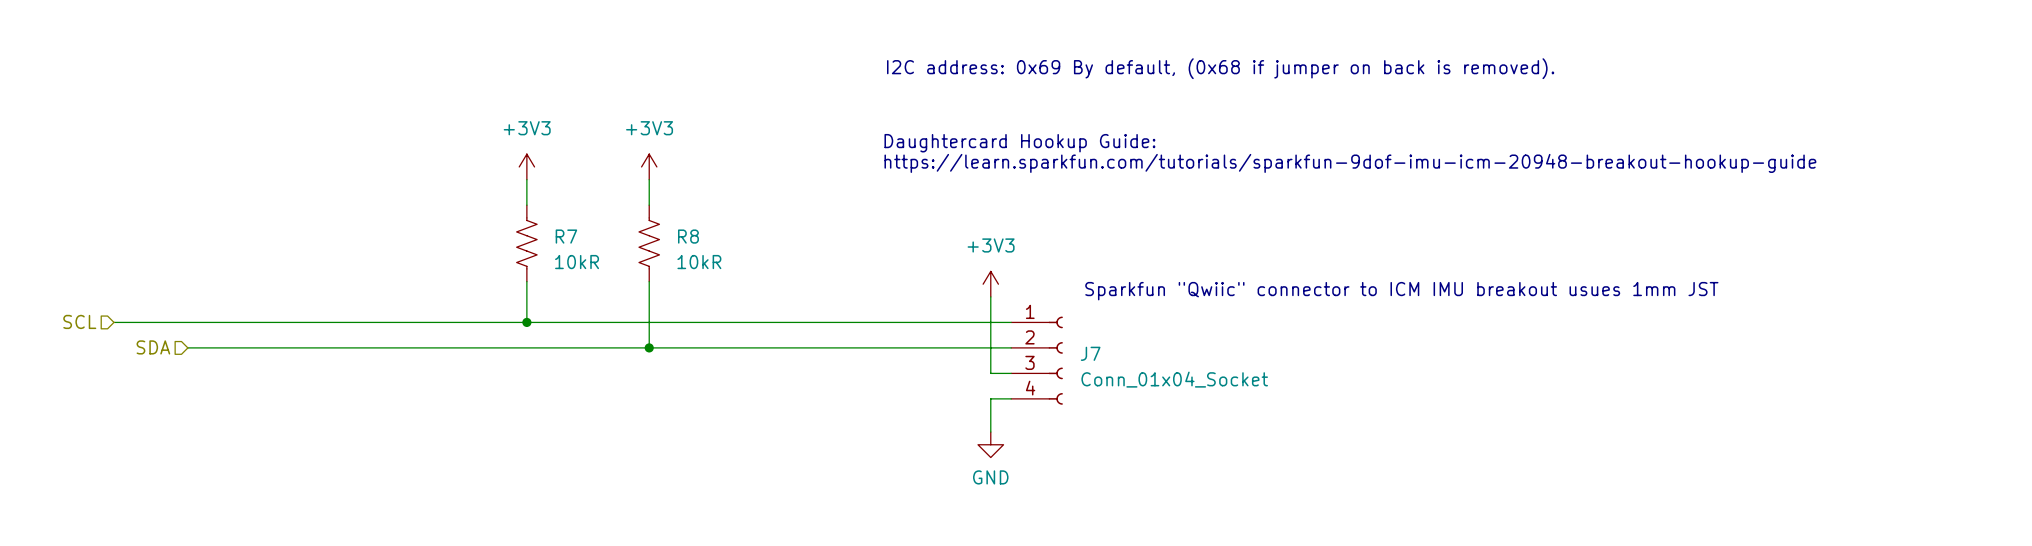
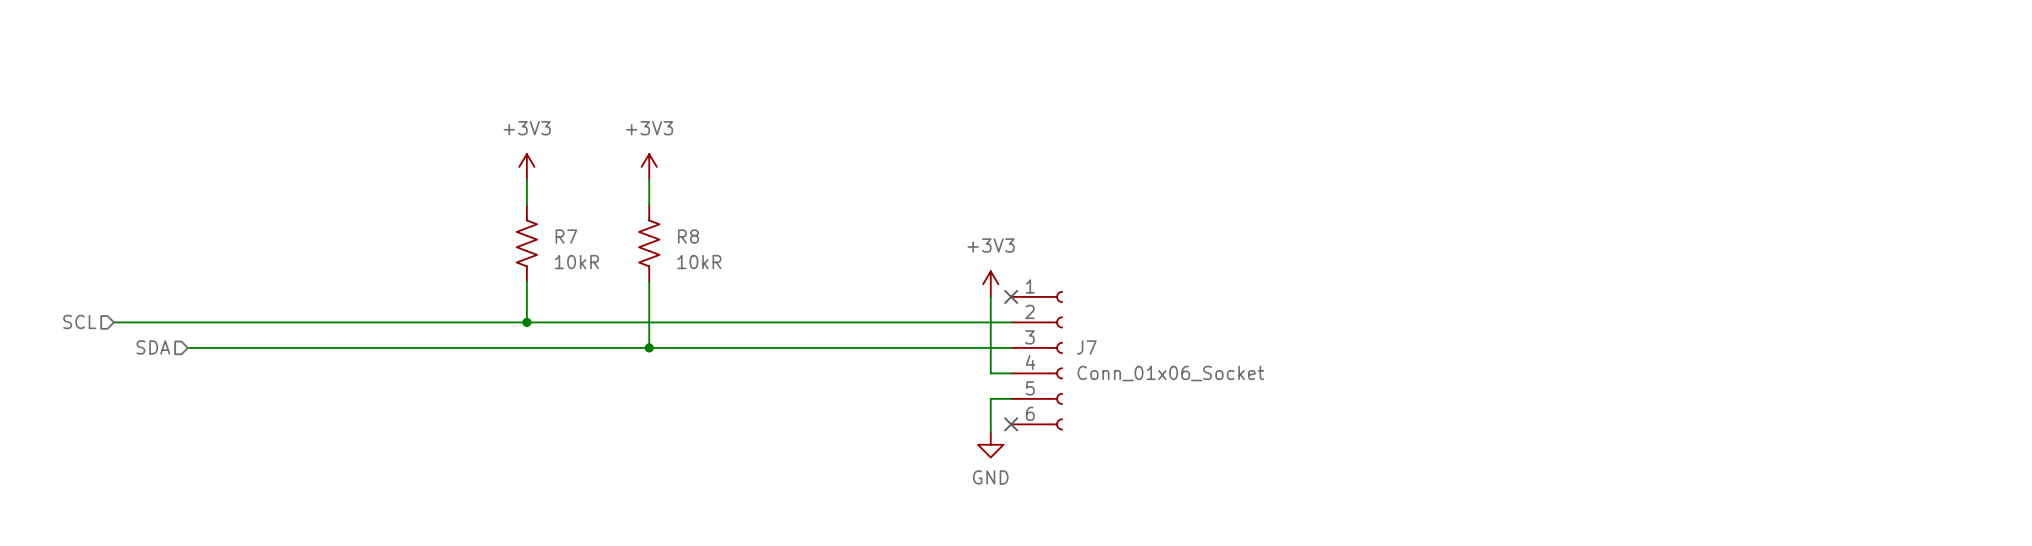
text: I2C address: 0x69 By default, (0x68 if jumper on back is removed). (1220, 68) -> none
text: Daughtercard Hookup Guide: (1019, 143) -> none
text: https://learn.sparkfun.com/tutorials/sparkfun-9dof-imu-icm-20948-breakout-hookup-guide (1350, 163) -> none
text: Sparkfun "Qwiic" connector to ICM IMU breakout usues 1mm JST (1401, 291) -> none
no-connect mark: none -> (1011, 296)
J7 symbol: [1011, 316, 1063, 405] -> [1011, 291, 1063, 431]
J7 value: Conn_01x04_Socket (1174, 379) -> Conn_01x06_Socket (1170, 373)
no-connect mark: none -> (1011, 424)

